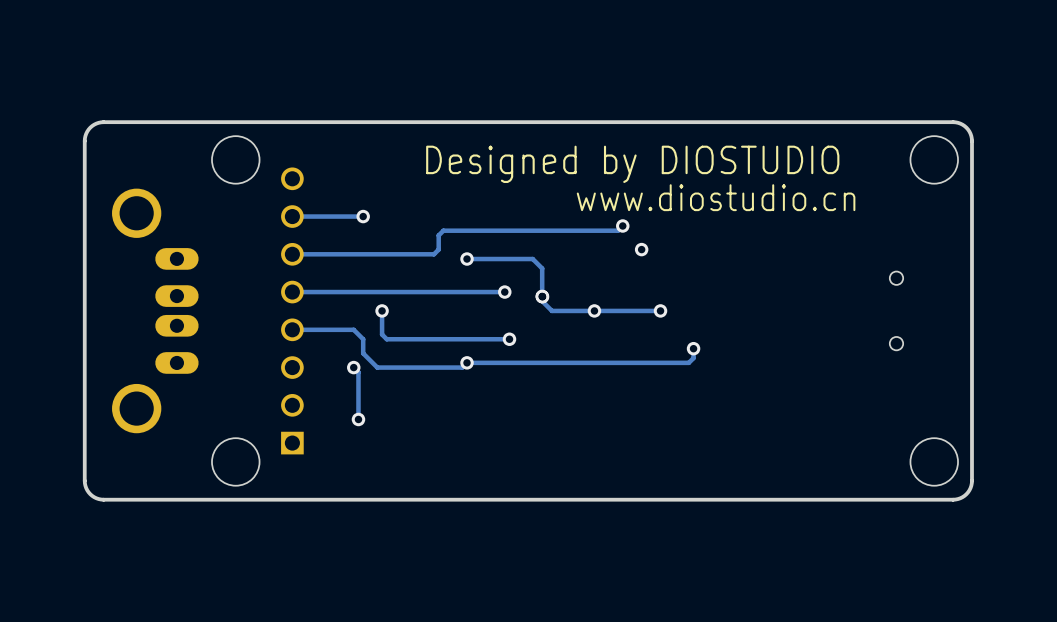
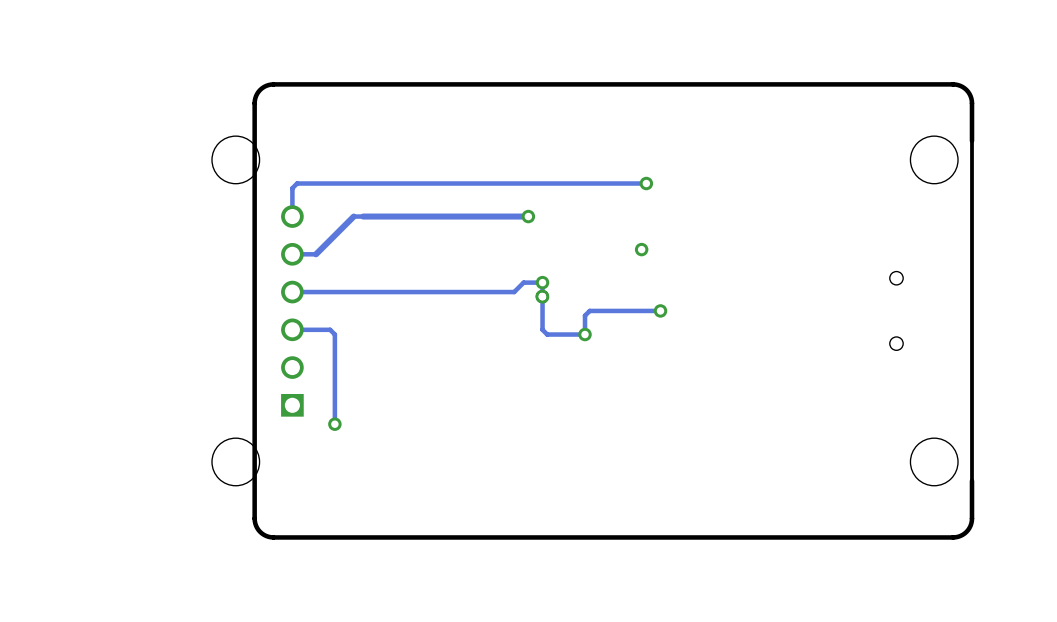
board edge: (971, 141) (966, 127) (953, 122) (103, 122) (90, 127) (84, 141) (84, 480) (87, 490) (96, 498) (953, 499) (966, 494) (971, 480) -> (971, 141) (971, 98) (964, 88) (953, 84) (273, 84) (260, 89) (254, 103) (254, 518) (257, 528) (264, 534) (273, 537) (955, 537) (964, 533) (971, 523) (971, 480)
text: Designed by DIOSTUDIO (632, 164) -> none
part footprint: [281, 167, 304, 455] -> [281, 205, 304, 417]
track: none -> (646, 183) (297, 183) (292, 188) (292, 216)
via: none -> (646, 183)
text: www.diostudio.cn (716, 197) -> none
track: (353, 216) (292, 216) -> (353, 216) (316, 254)
via: (363, 216) -> none
track: none -> (528, 216) (363, 216)
via: none -> (528, 216)
track: (622, 225) (618, 230) (443, 230) (438, 235) (438, 249) (433, 254) (316, 254) -> none
via: (622, 225) -> none
track: (467, 259) (532, 259) (542, 268) (542, 301) (551, 310) (589, 310) -> (504, 292) (514, 292) (523, 282) (542, 282) (542, 329) (547, 334) (585, 334) (585, 315) (589, 310)
via: (467, 259) -> none
via: none -> (542, 282)
via: (504, 292) -> none
part: (155, 310) -> none
track: (382, 310) (382, 334) (386, 339) (509, 339) -> none
via: (382, 310) -> none
via position: (594, 310) -> (585, 334)
track: (330, 329) (353, 329) (363, 339) (363, 353) (377, 367) (462, 367) (467, 362) (688, 362) (693, 358) (693, 348) -> (330, 329) (334, 334) (334, 424)
via: (509, 339) -> none
via: (693, 348) -> none
via: (467, 362) -> none
track: (353, 367) (358, 372) (358, 419) -> none
via: (353, 367) -> none
via position: (358, 419) -> (334, 424)

